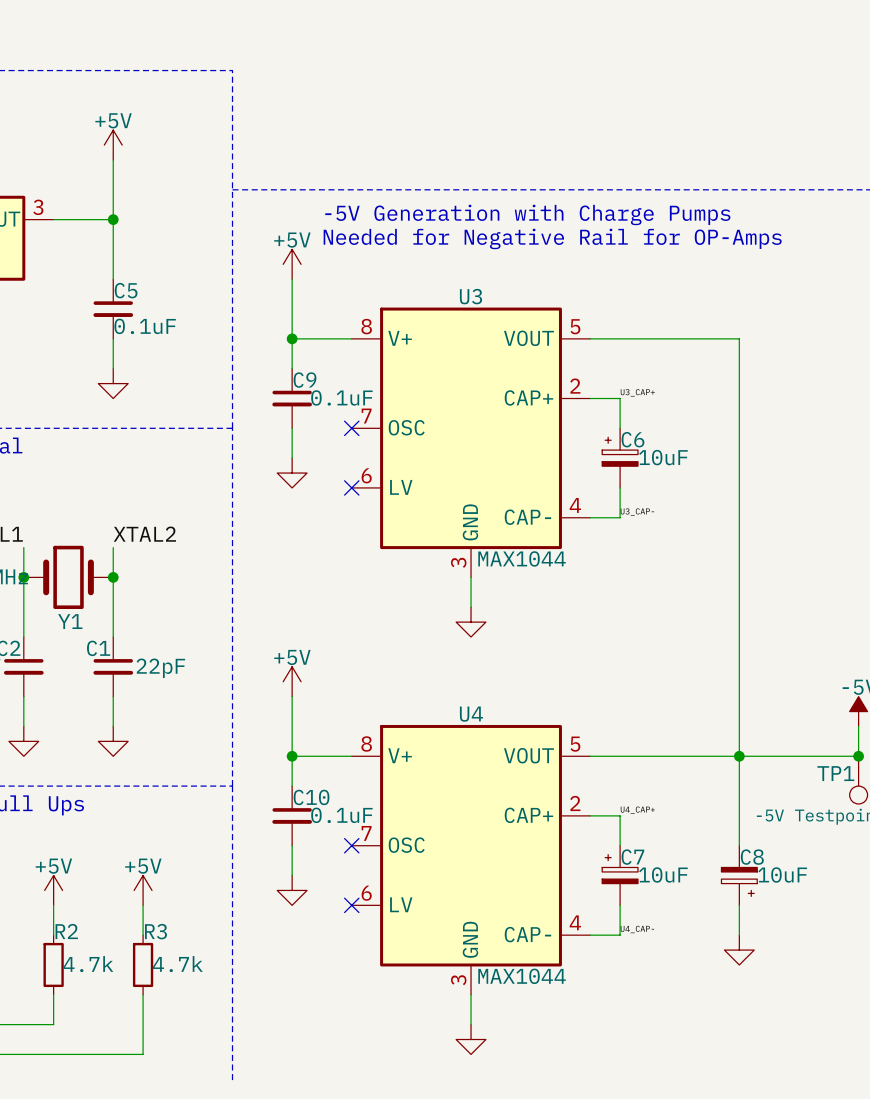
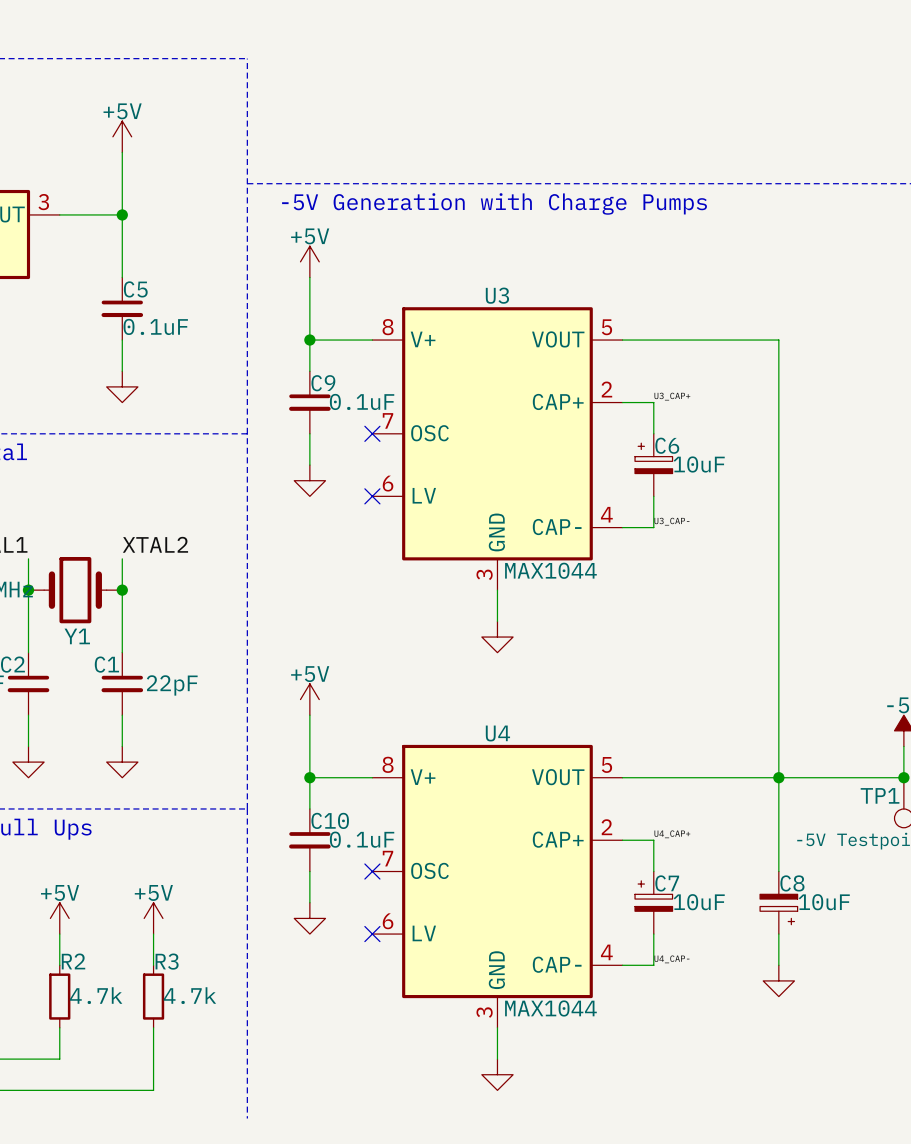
text position: -5V Generation with Charge Pumps (527, 214) -> -5V Generation with Charge Pumps (494, 203)
text: Needed for Negative Rail for OP-Amps (552, 238) -> none

